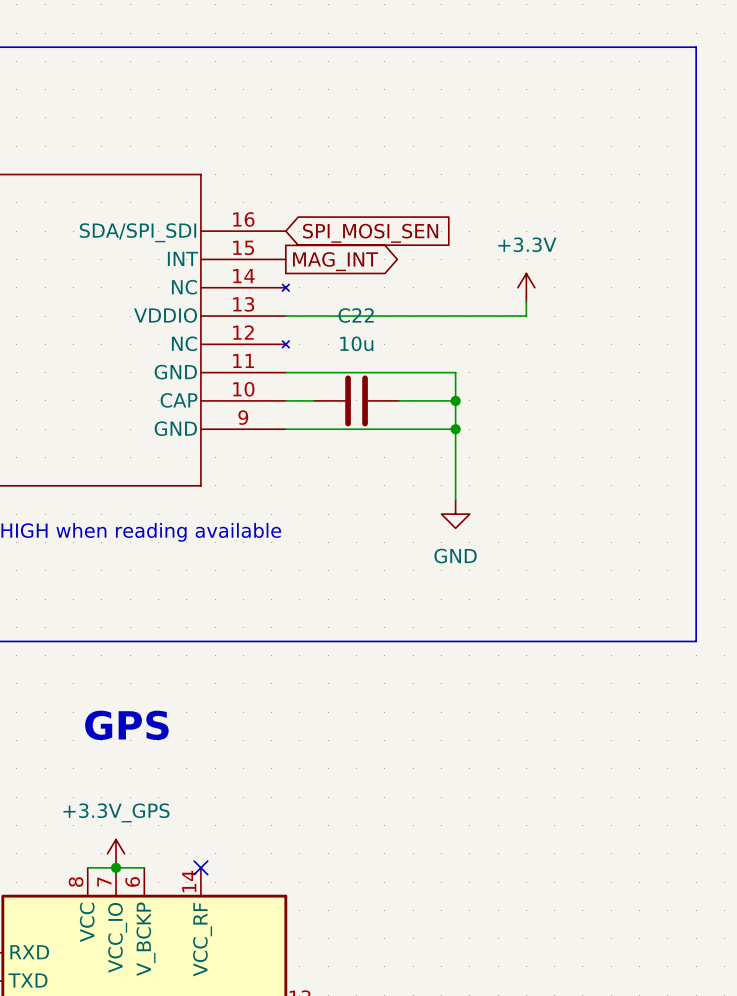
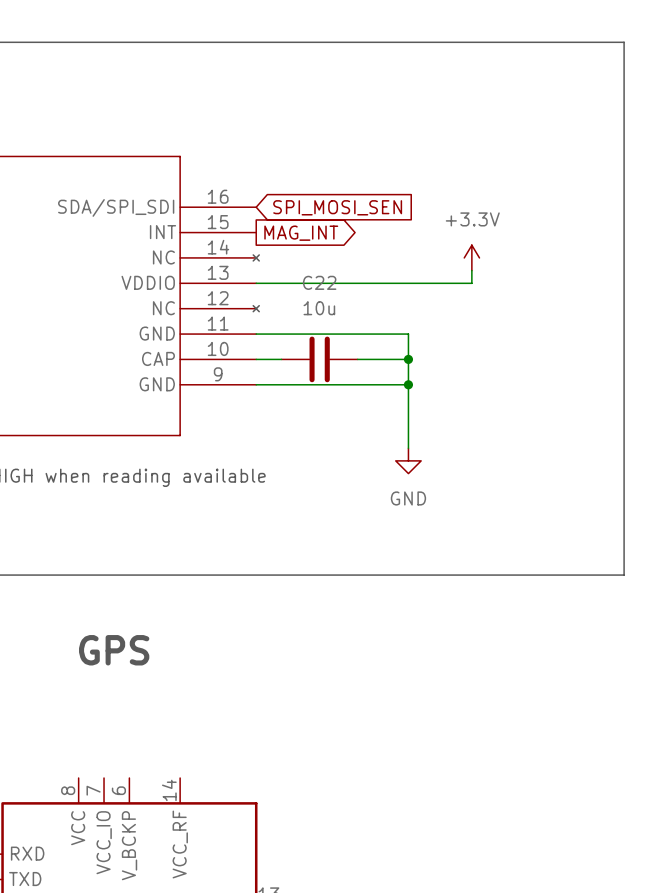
power symbol: +3.3V_GPS (116, 853) -> none
wire: (87, 867) (144, 867) -> none
junction: (116, 867) -> none
no-connect mark: (200, 867) -> none

